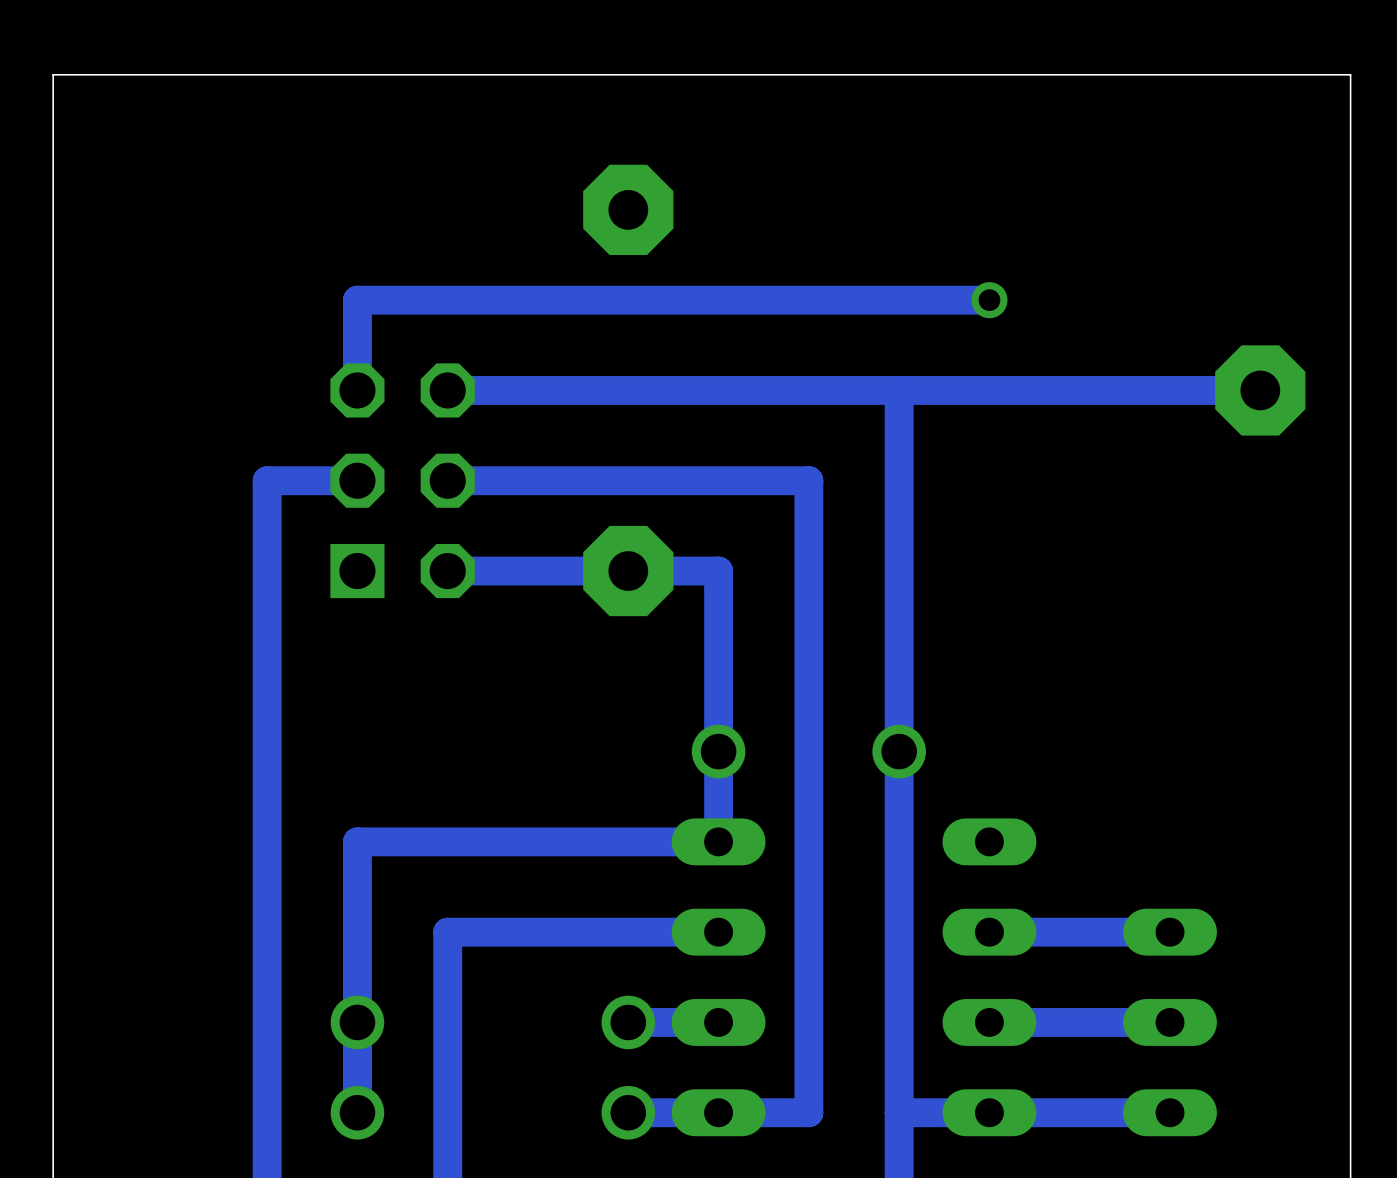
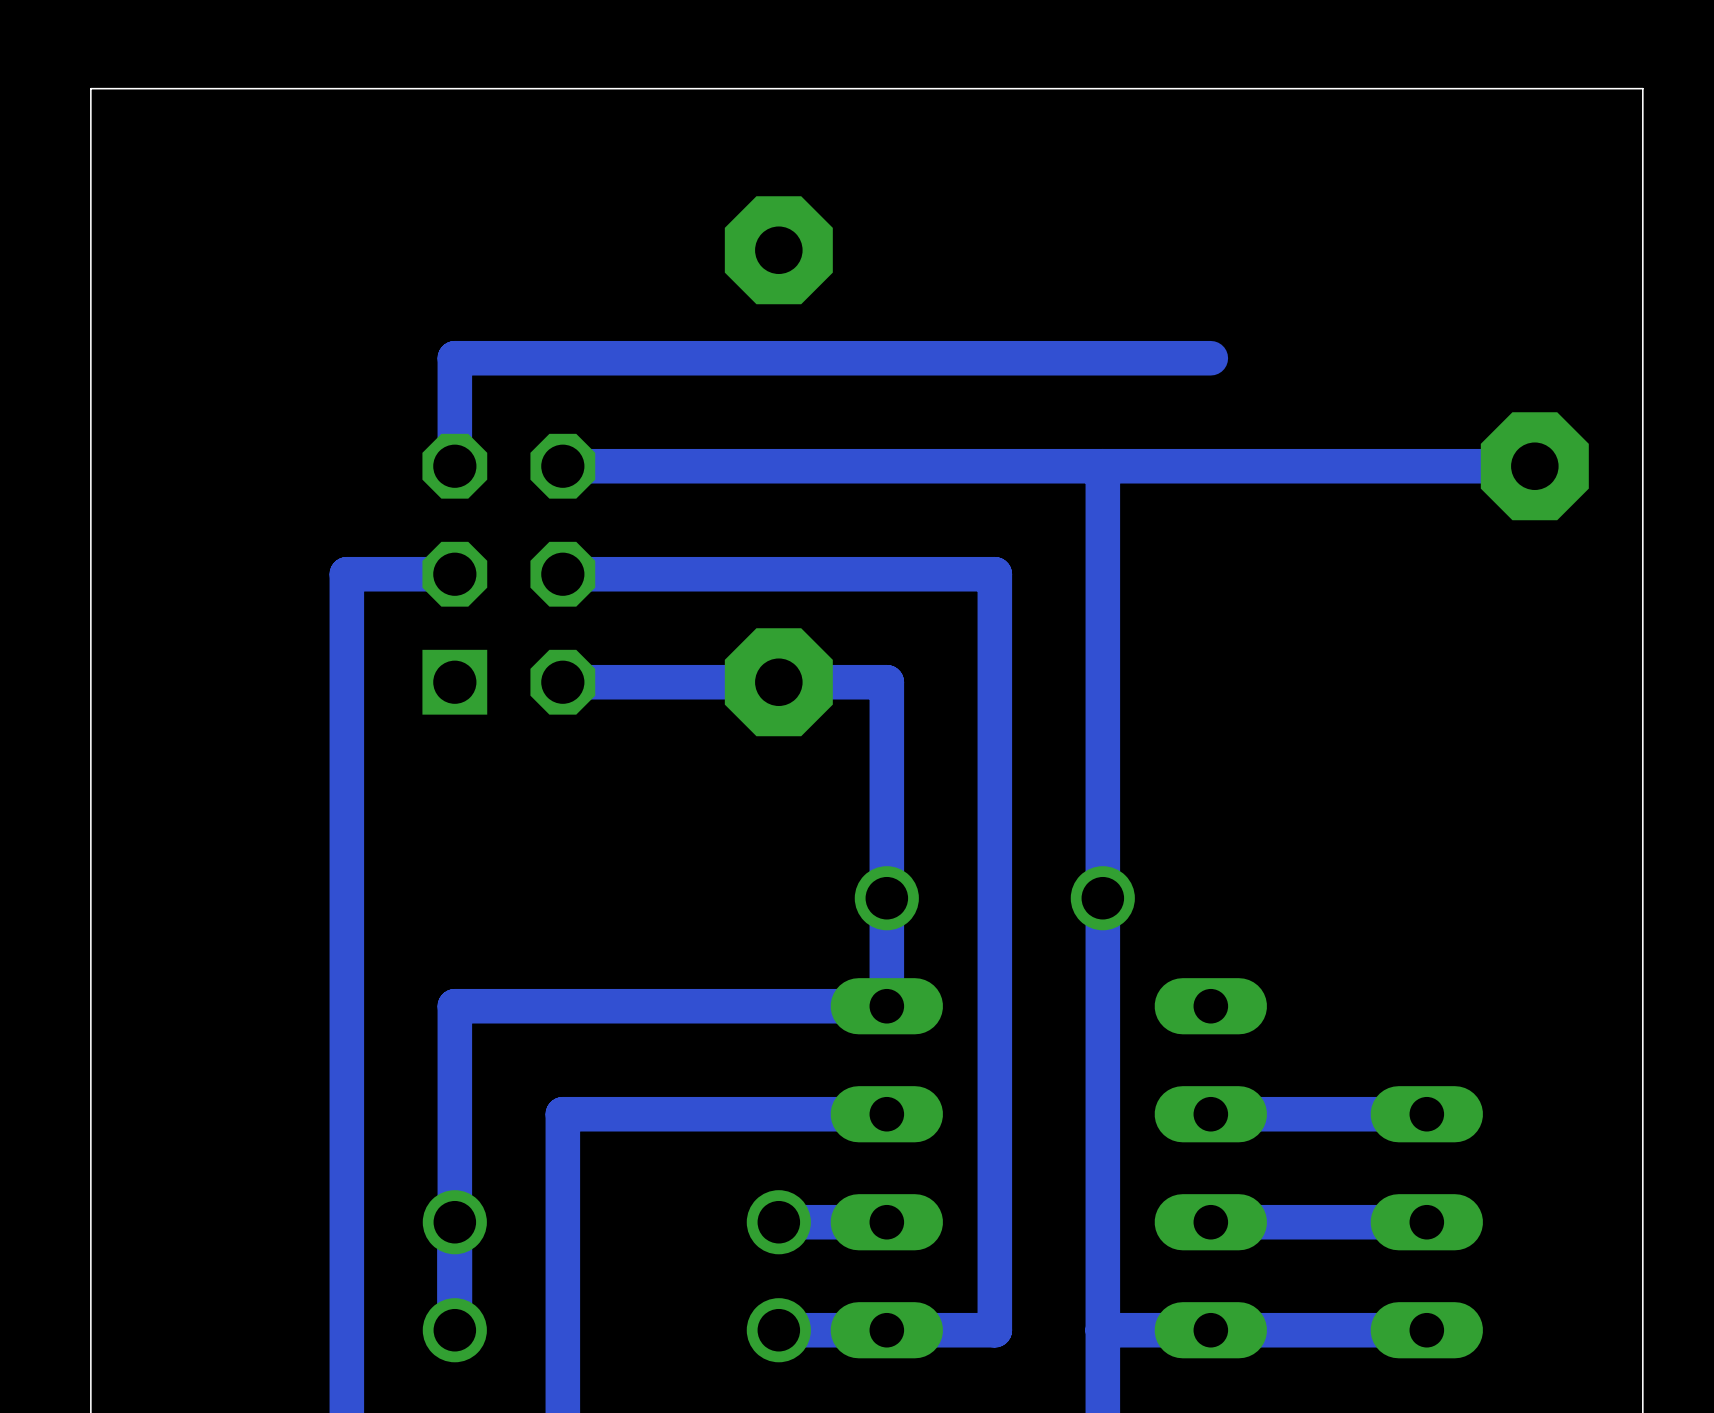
via: (989, 300) -> none

